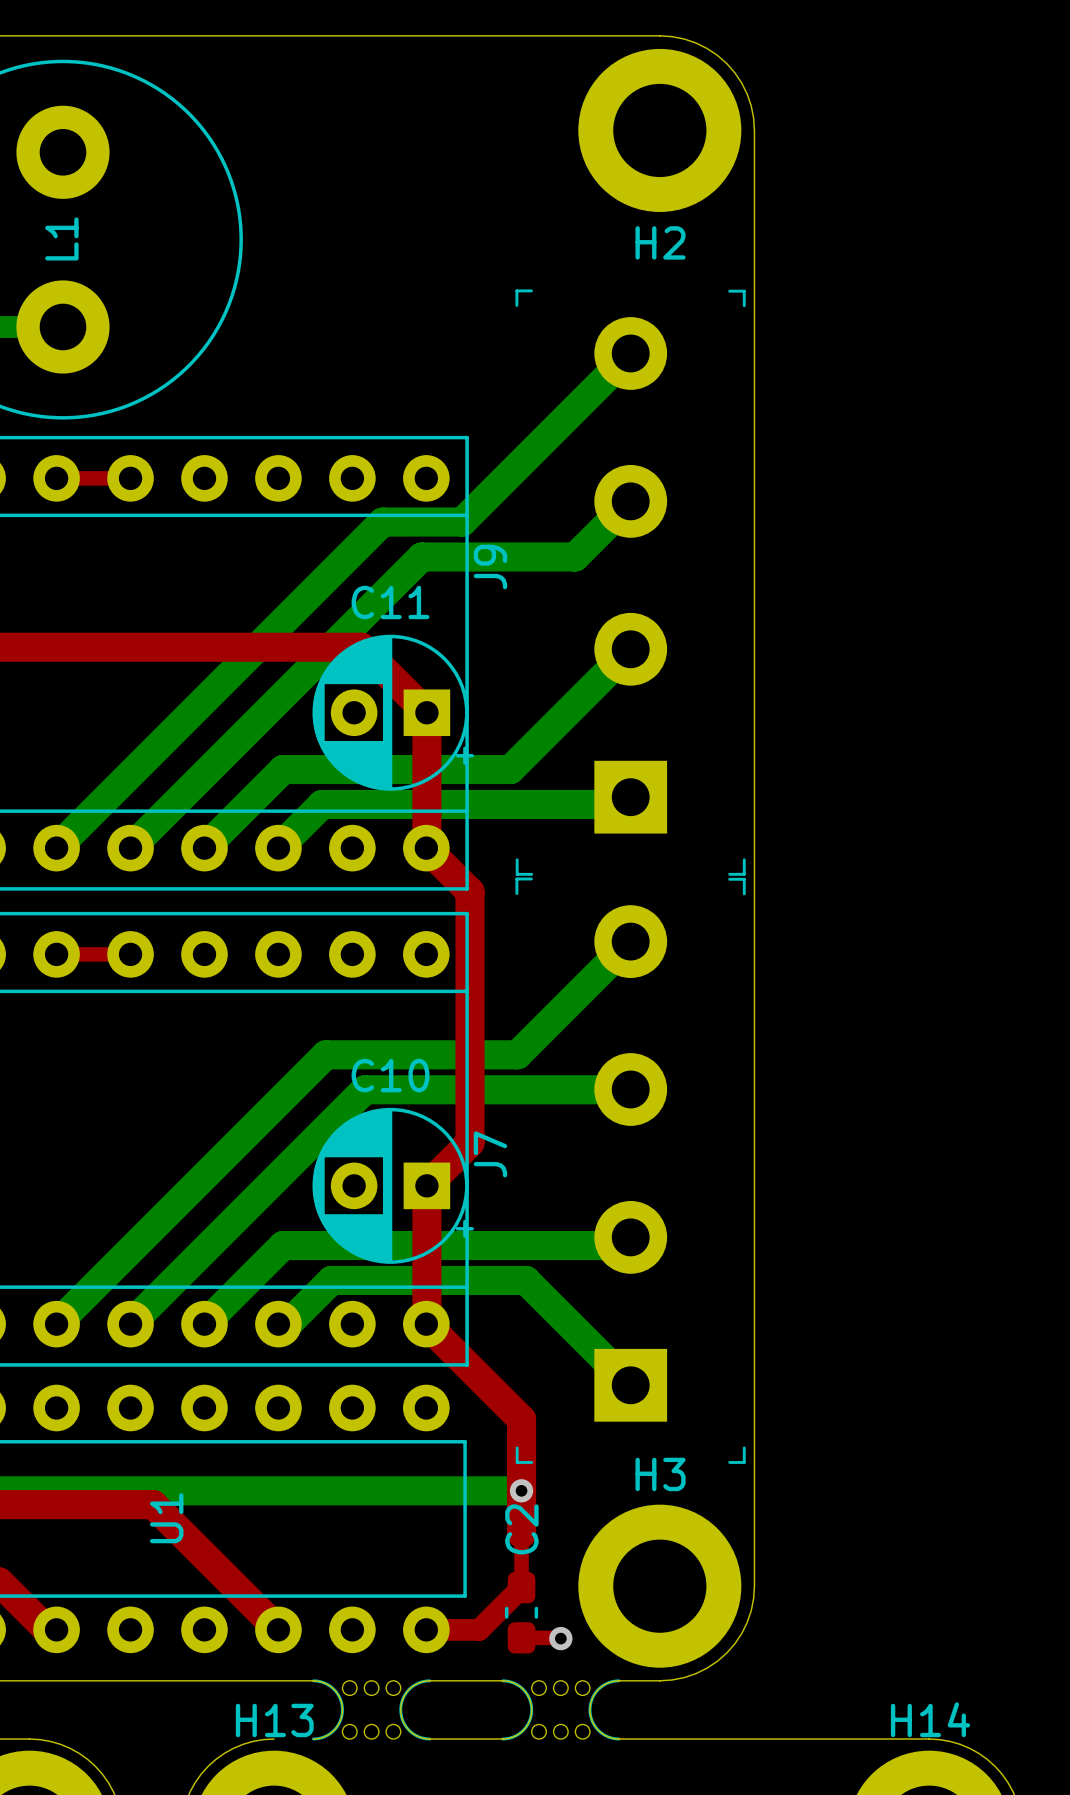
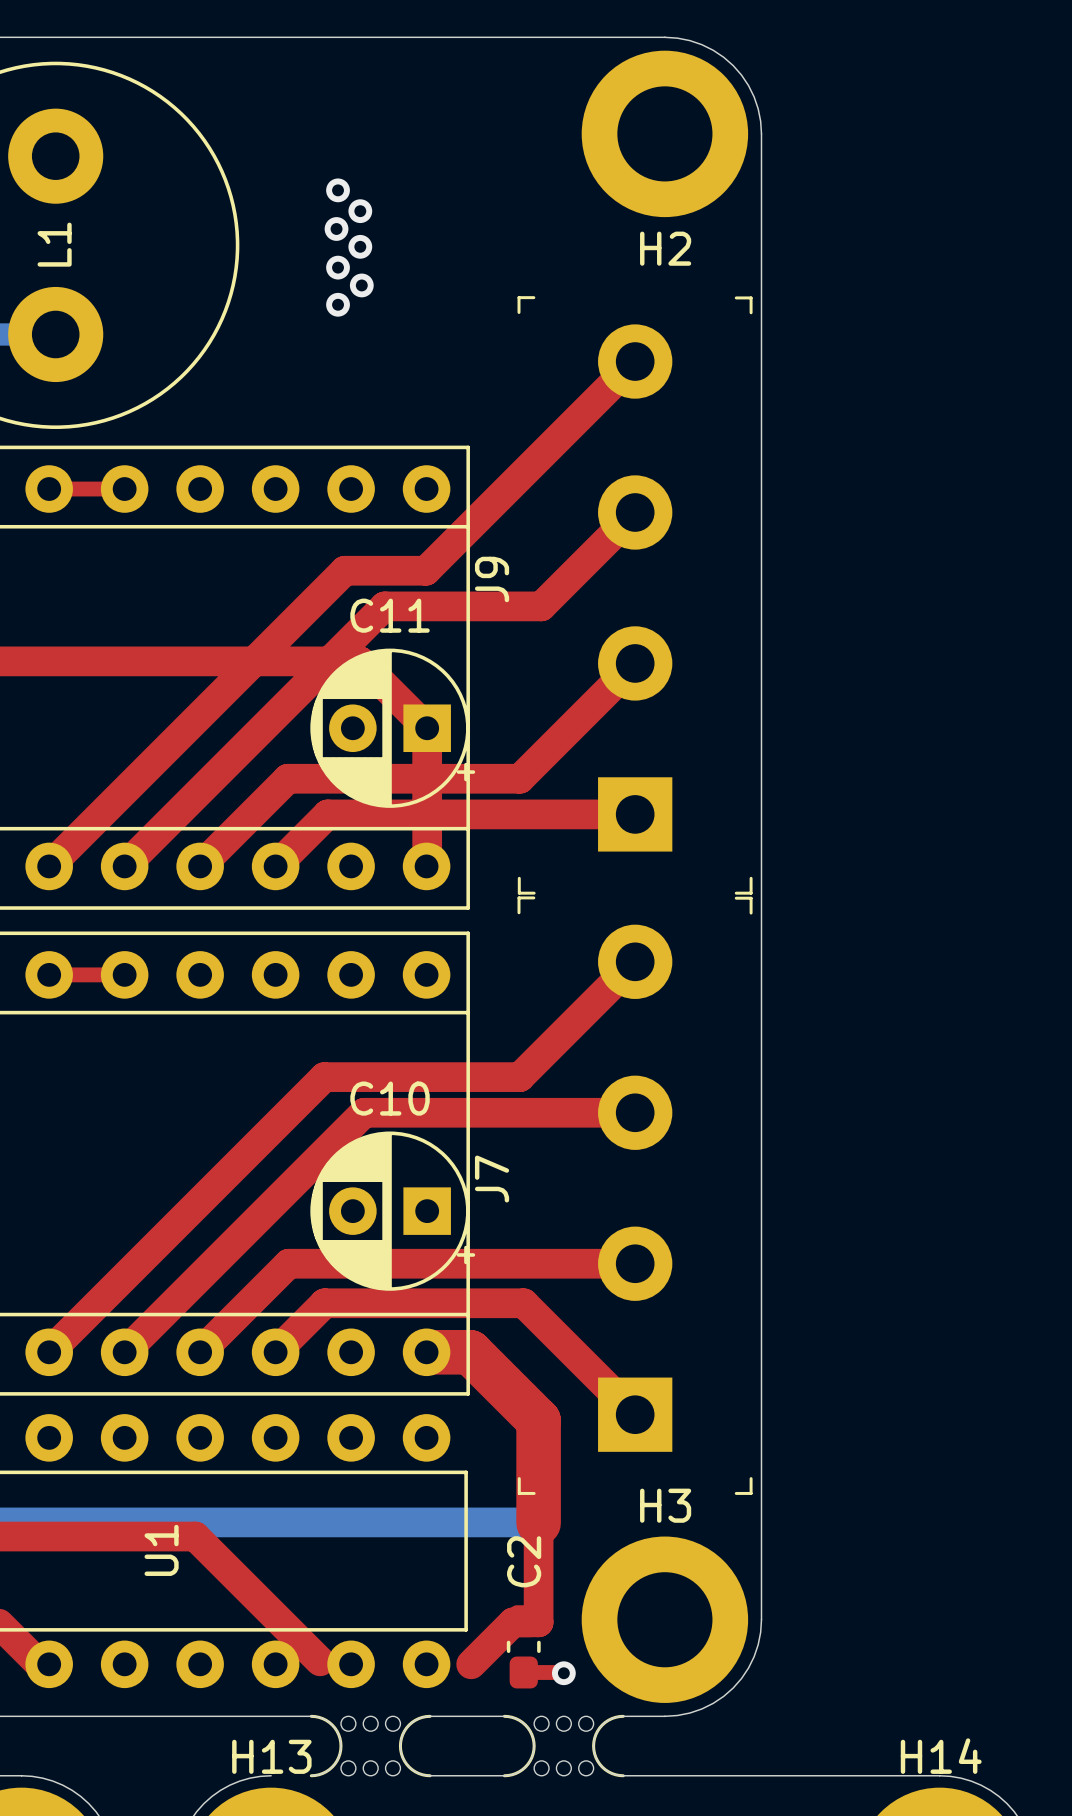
via: none -> (338, 190)
via: none -> (360, 211)
via: none -> (336, 228)
via: none -> (360, 246)
via: none -> (338, 267)
via: none -> (361, 285)
via: none -> (338, 304)
top track: none -> (635, 361) (425, 570) (344, 570) (49, 866)
bottom track: (630, 353) (462, 522) (382, 522) (56, 848) -> none
top track: none -> (635, 512) (541, 606) (384, 606) (124, 866)
bottom track: (630, 501) (575, 556) (421, 556) (130, 848) -> none
top track: none -> (635, 663) (519, 778) (287, 778) (200, 866)
bottom track: (630, 649) (510, 769) (283, 769) (204, 848) -> none
top track: none -> (635, 814) (327, 814) (275, 866)
bottom track: (623, 804) (322, 804) (278, 848) -> none
top track: (426, 848) (470, 891) (470, 1142) (426, 1185) (426, 1323) -> none
top track: none -> (635, 961) (519, 1077) (324, 1077) (49, 1352)
bottom track: (630, 941) (517, 1054) (325, 1054) (56, 1324) -> none
top track: none -> (635, 1112) (364, 1112) (124, 1352)
bottom track: (630, 1089) (364, 1089) (130, 1324) -> none
top track: none -> (635, 1263) (288, 1263) (200, 1352)
bottom track: (622, 1245) (283, 1245) (204, 1324) -> none
top track: none -> (275, 1352) (324, 1303) (523, 1303) (635, 1414)
bottom track: (278, 1324) (287, 1324) (331, 1280) (525, 1280) (630, 1385) -> none
top track: (426, 1324) (521, 1419) (521, 1587) (479, 1629) (426, 1629) -> (426, 1352) (470, 1352) (538, 1420) (538, 1622) (513, 1622) (471, 1664)
via: (521, 1490) -> none
top track: (153, 1504) (278, 1629) -> (147, 1536) (195, 1536) (320, 1661)

